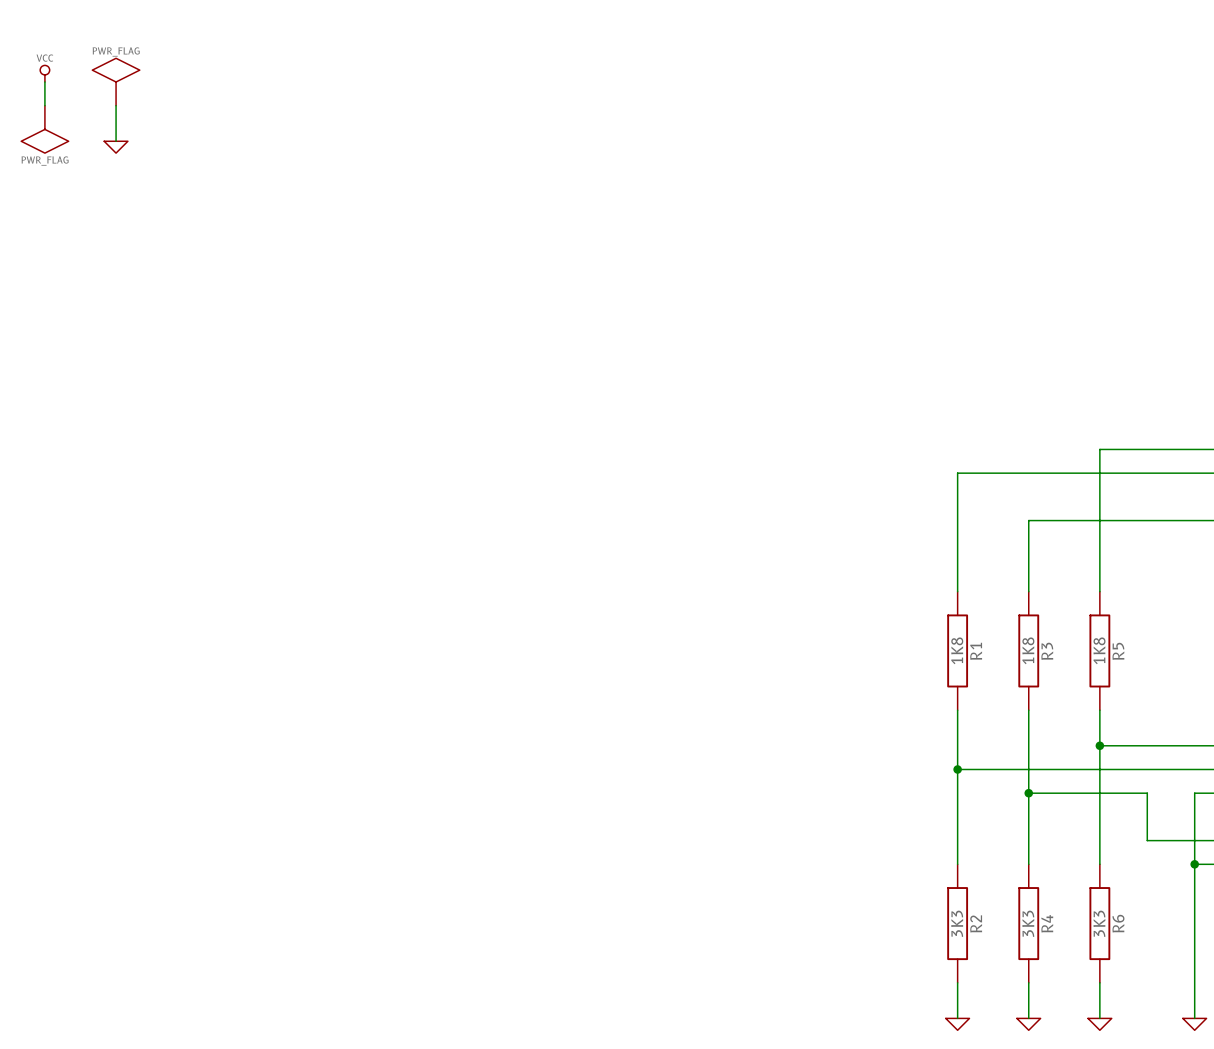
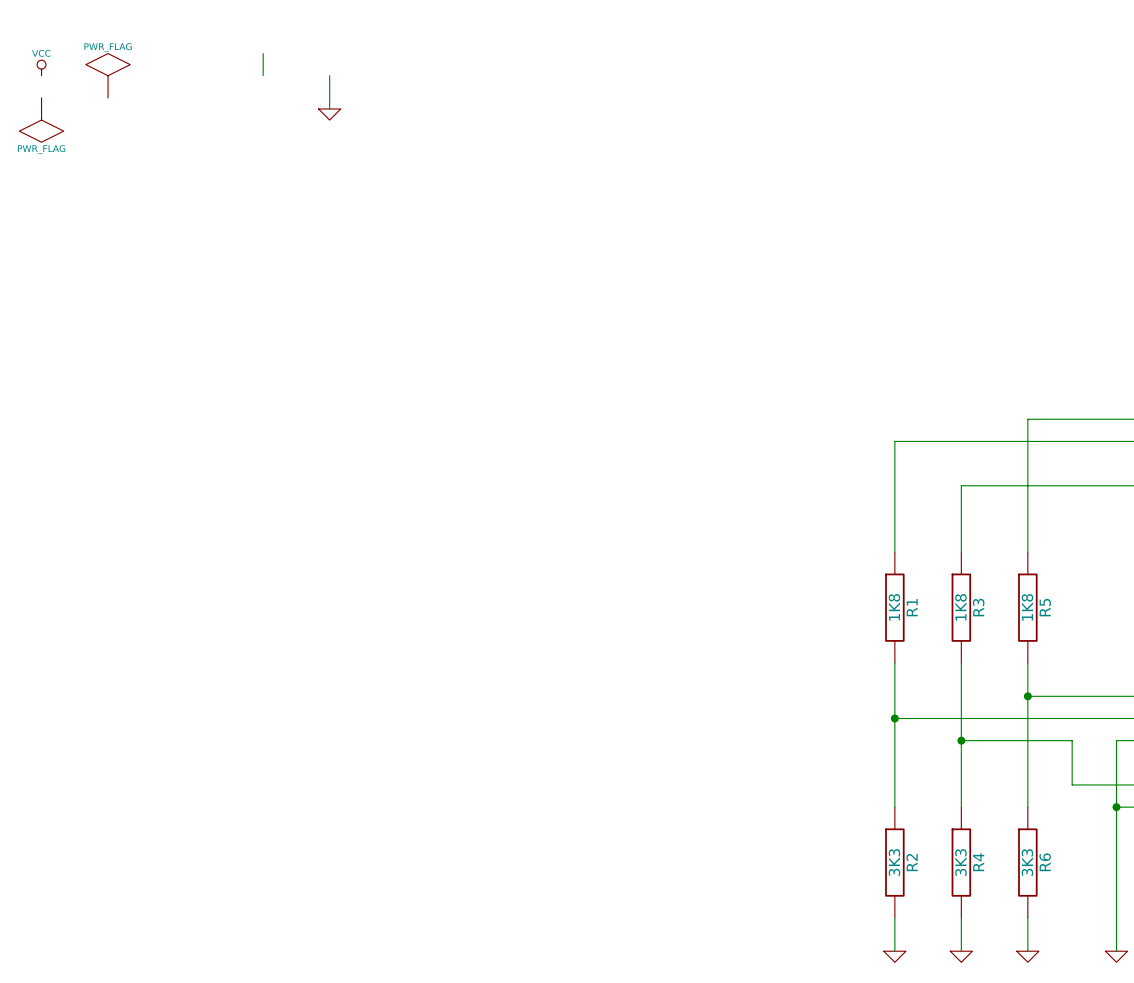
wire: none -> (263, 53) (263, 75)
wire: (44, 82) (44, 105) -> none
wire: none -> (329, 75) (329, 108)
wire: (116, 105) (116, 141) -> none
power symbol: none -> (329, 114)
power symbol: (116, 147) -> none

